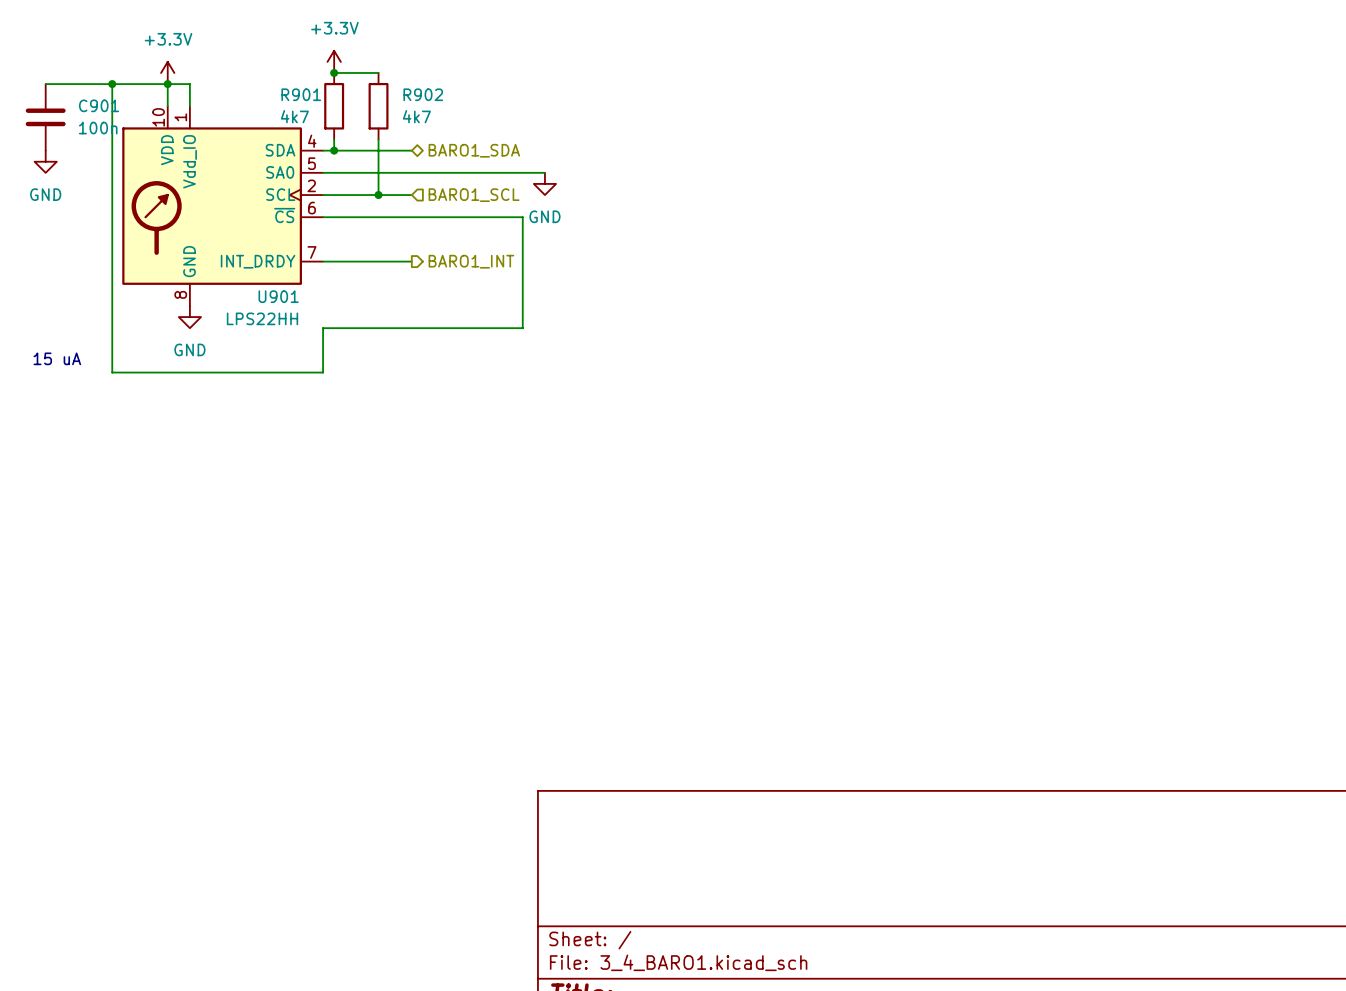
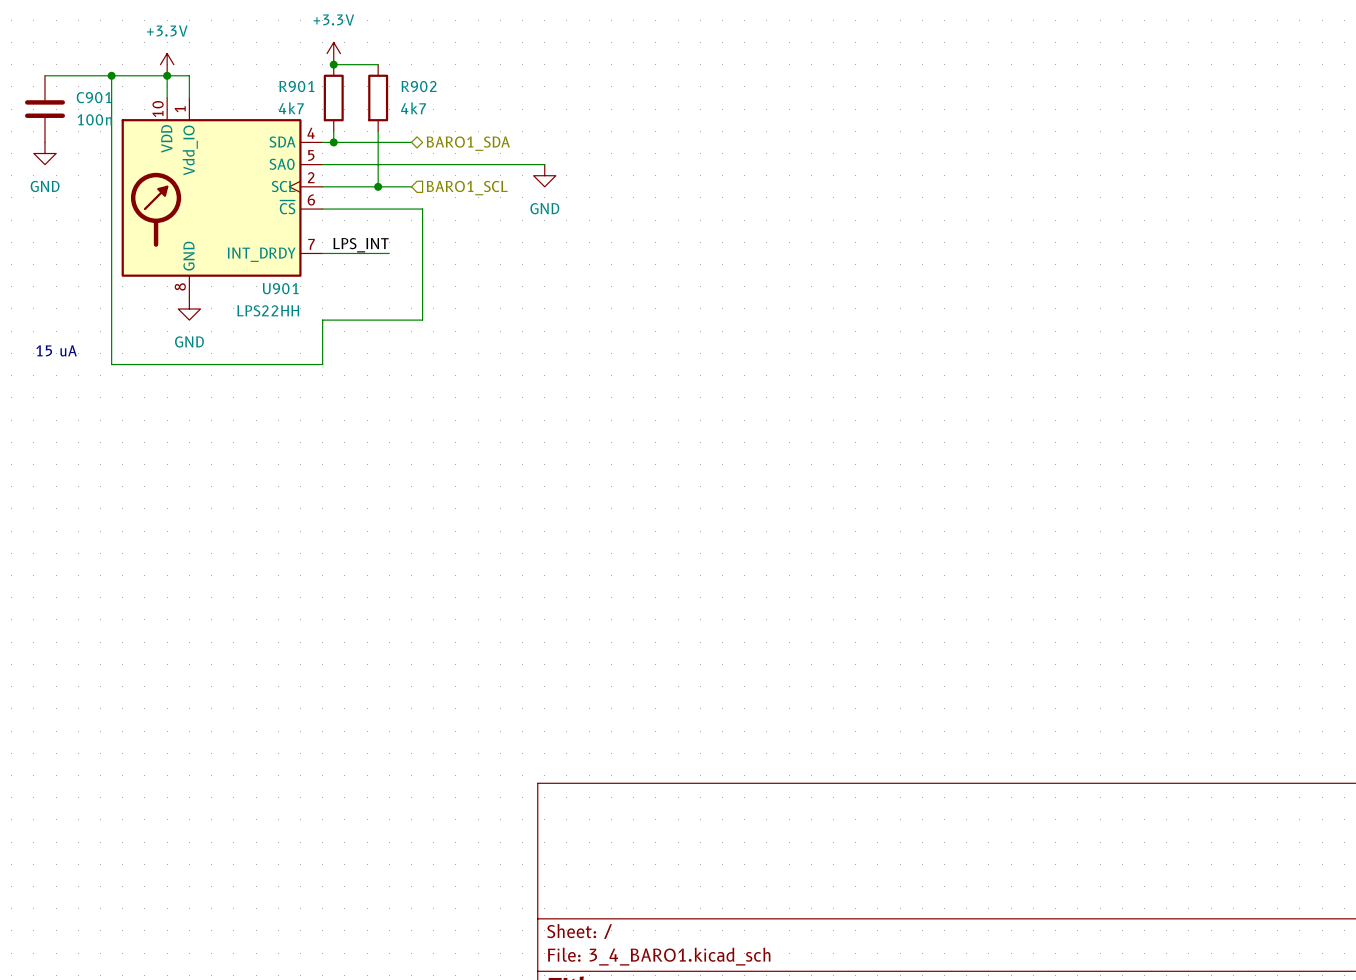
wire: (422, 217) (522, 217) (522, 328) (422, 328) -> (422, 209) (422, 320)
label: none -> LPS_INT (361, 245)
wire: (389, 261) (411, 261) -> none
hierarchical label: BARO1_INT (471, 261) -> none

